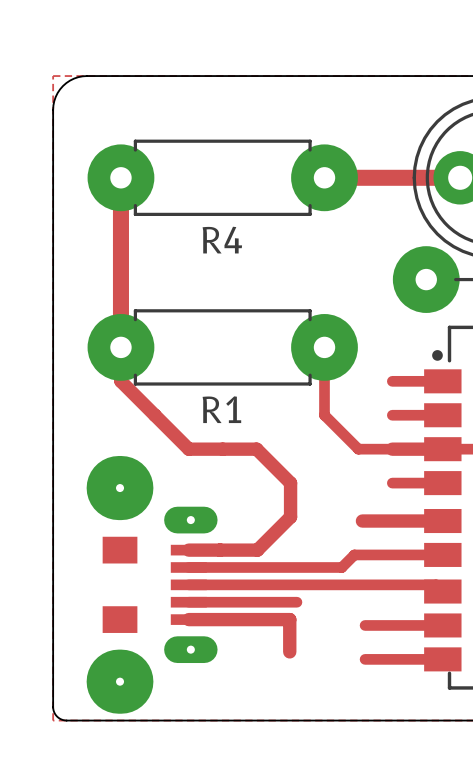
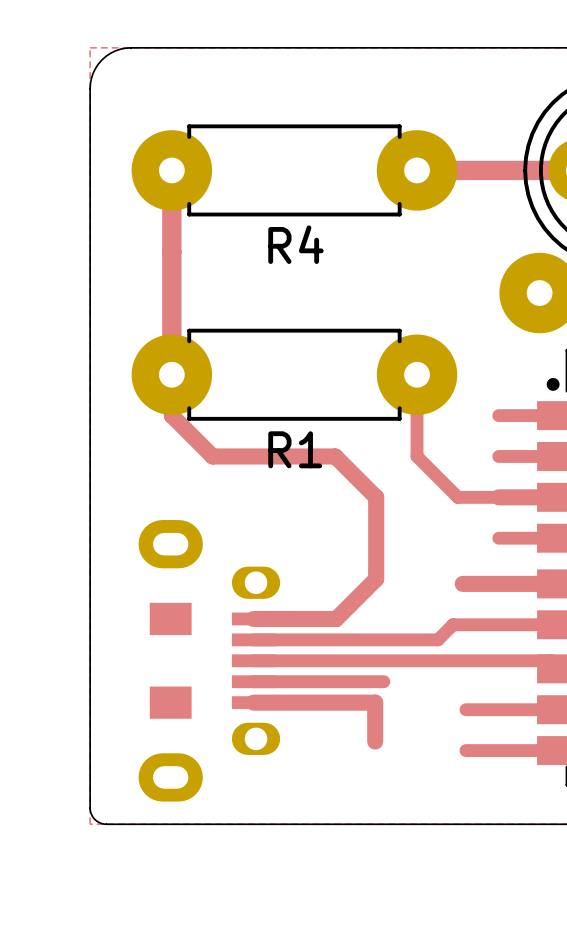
track: (154, 415) (188, 449) (256, 449) (290, 483) -> (212, 456) (335, 456) (376, 497) (376, 538)
part footprint: [86, 455, 218, 714] -> [138, 520, 281, 802]

